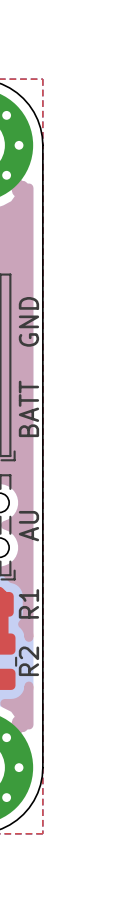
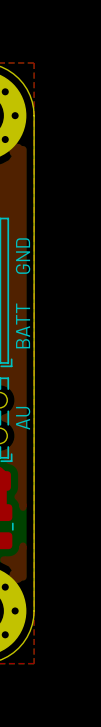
R1 name: R1 (28, 603) -> none
R2 name: R2 (28, 661) -> none

